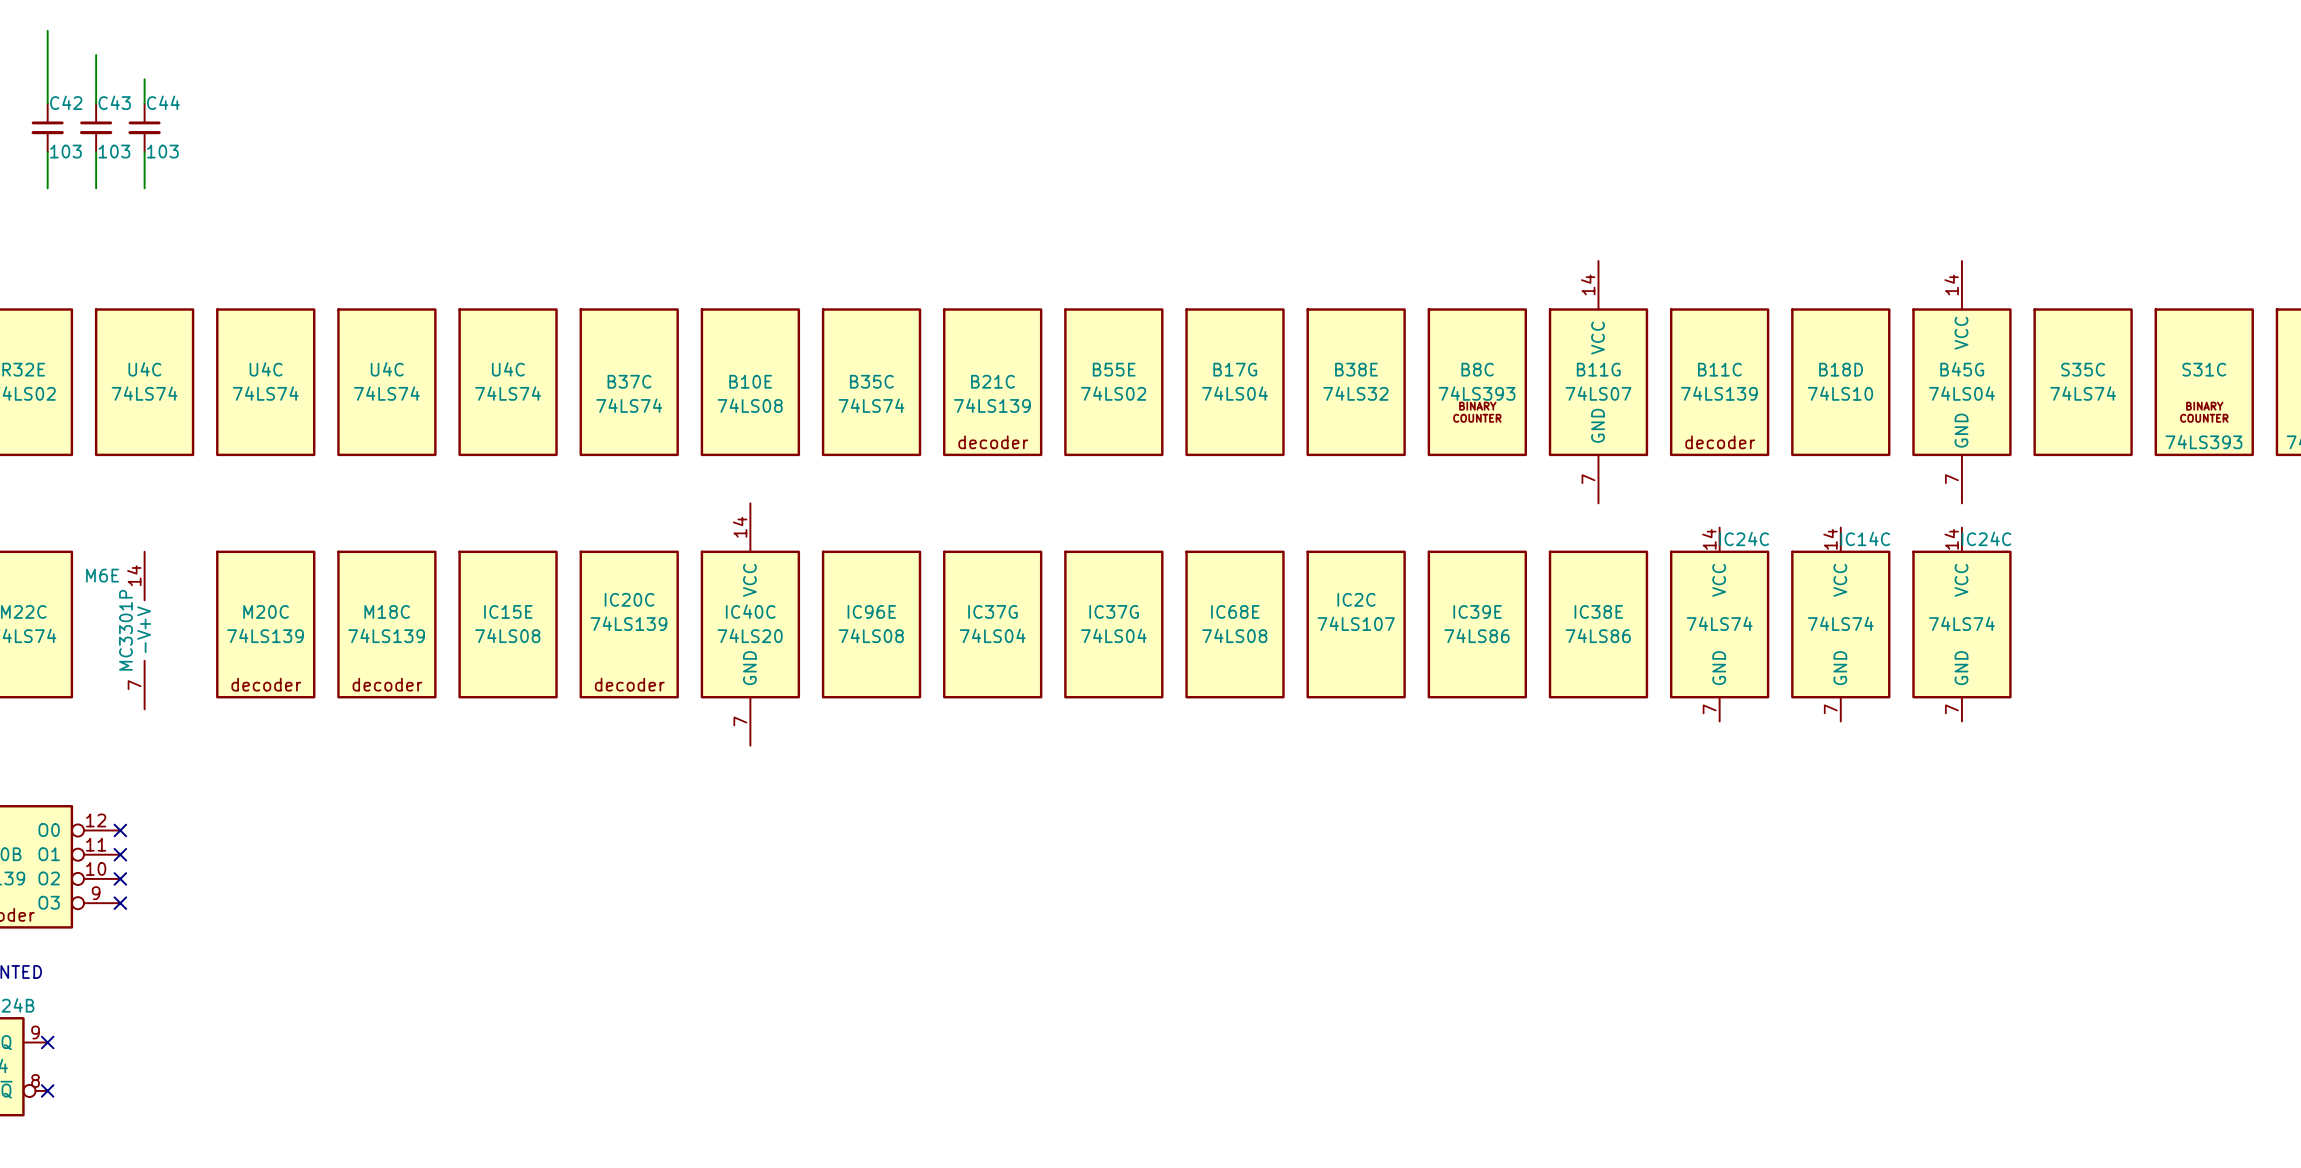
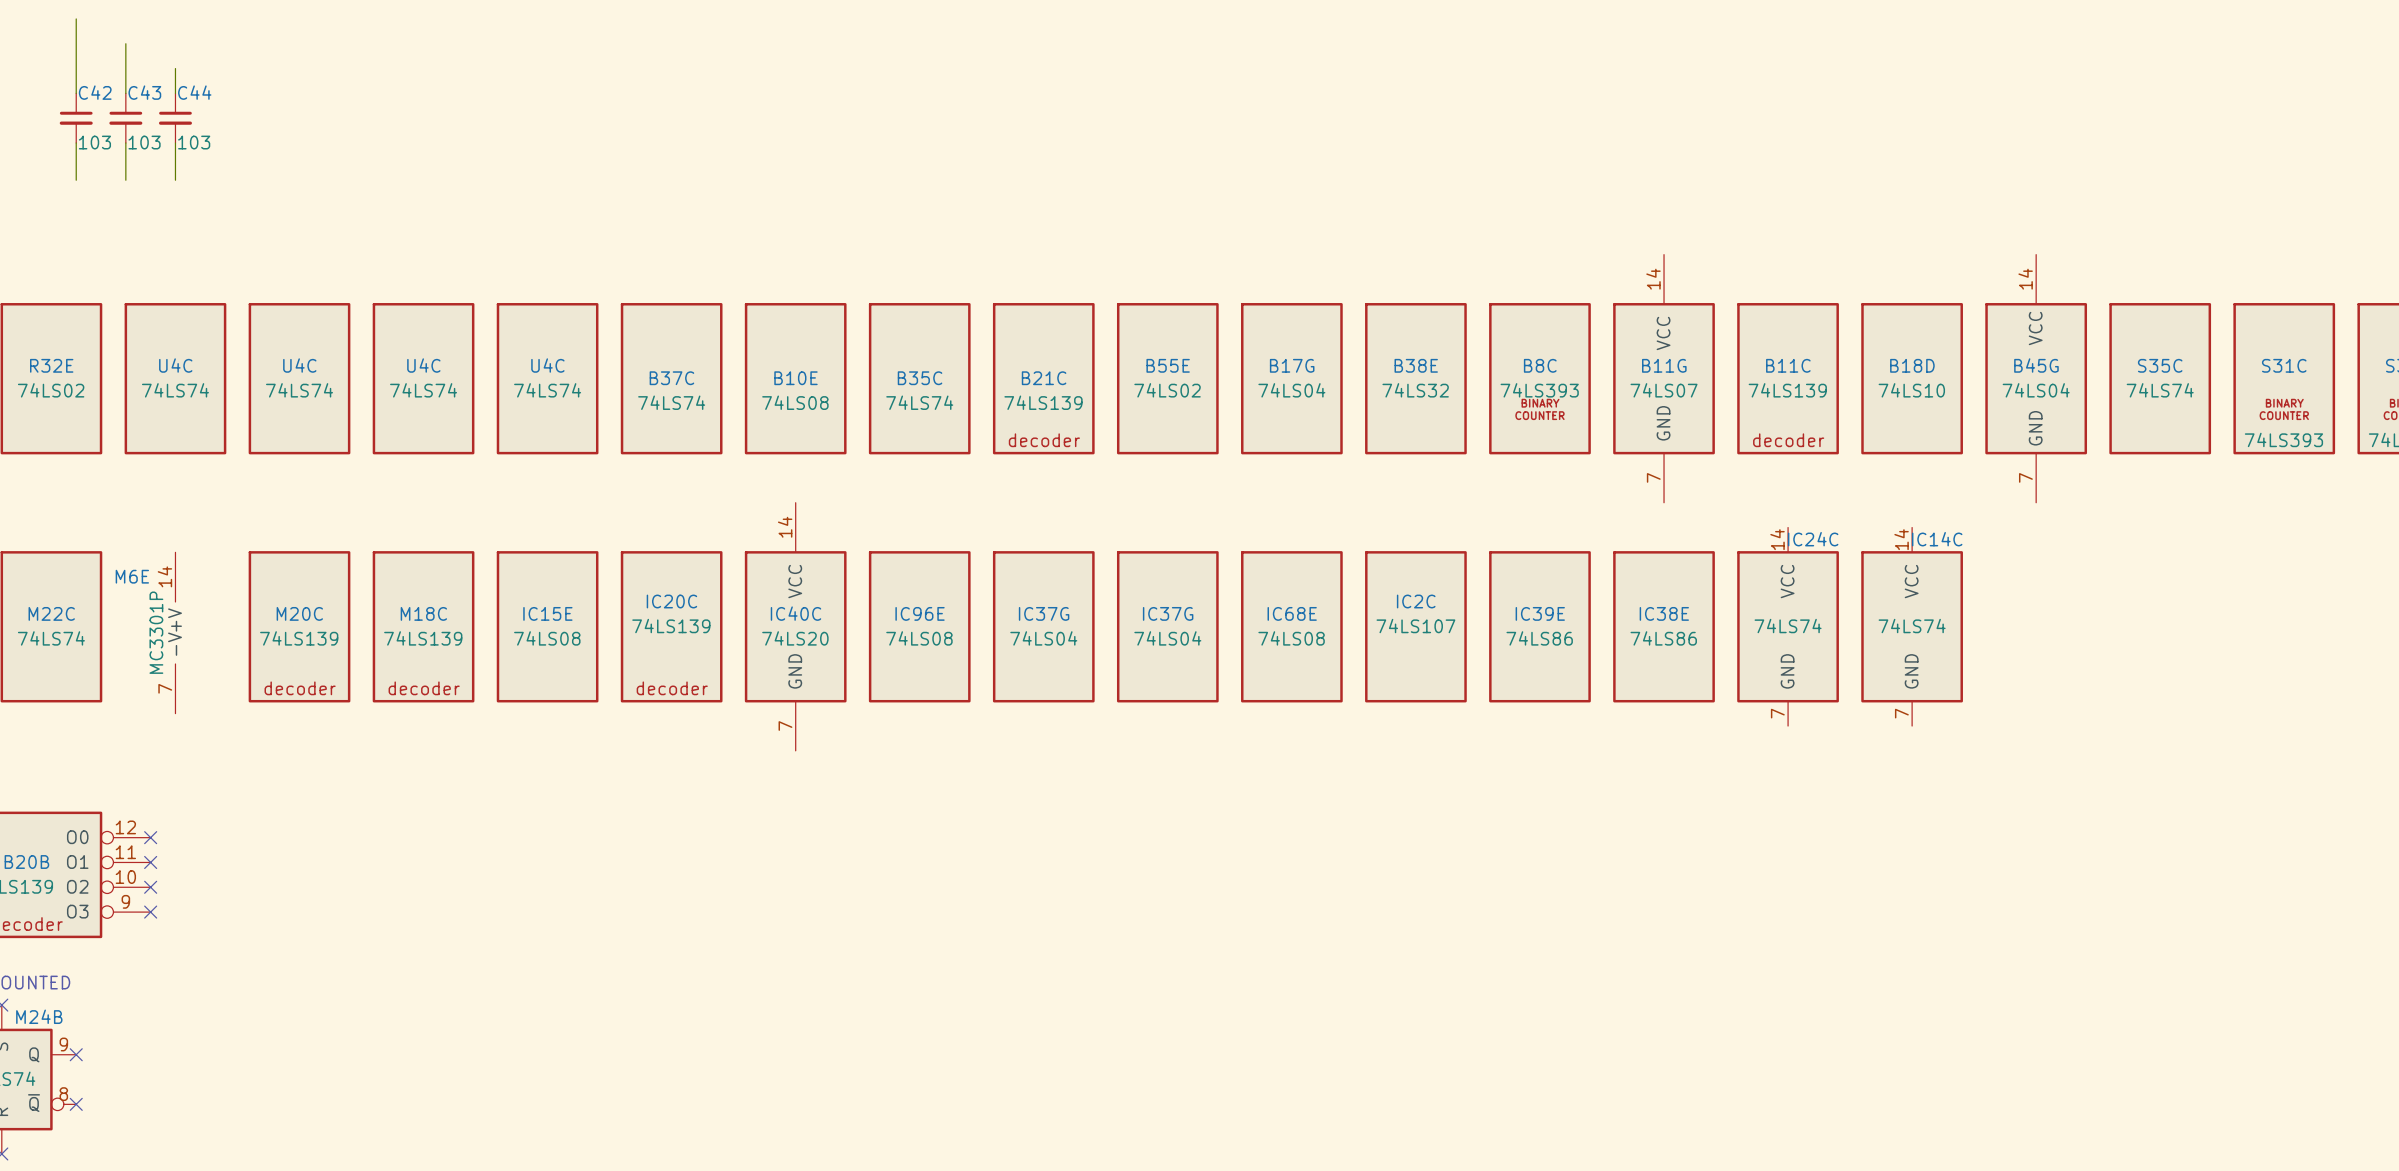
IC24C: 74LS74 (1961, 624) -> none

